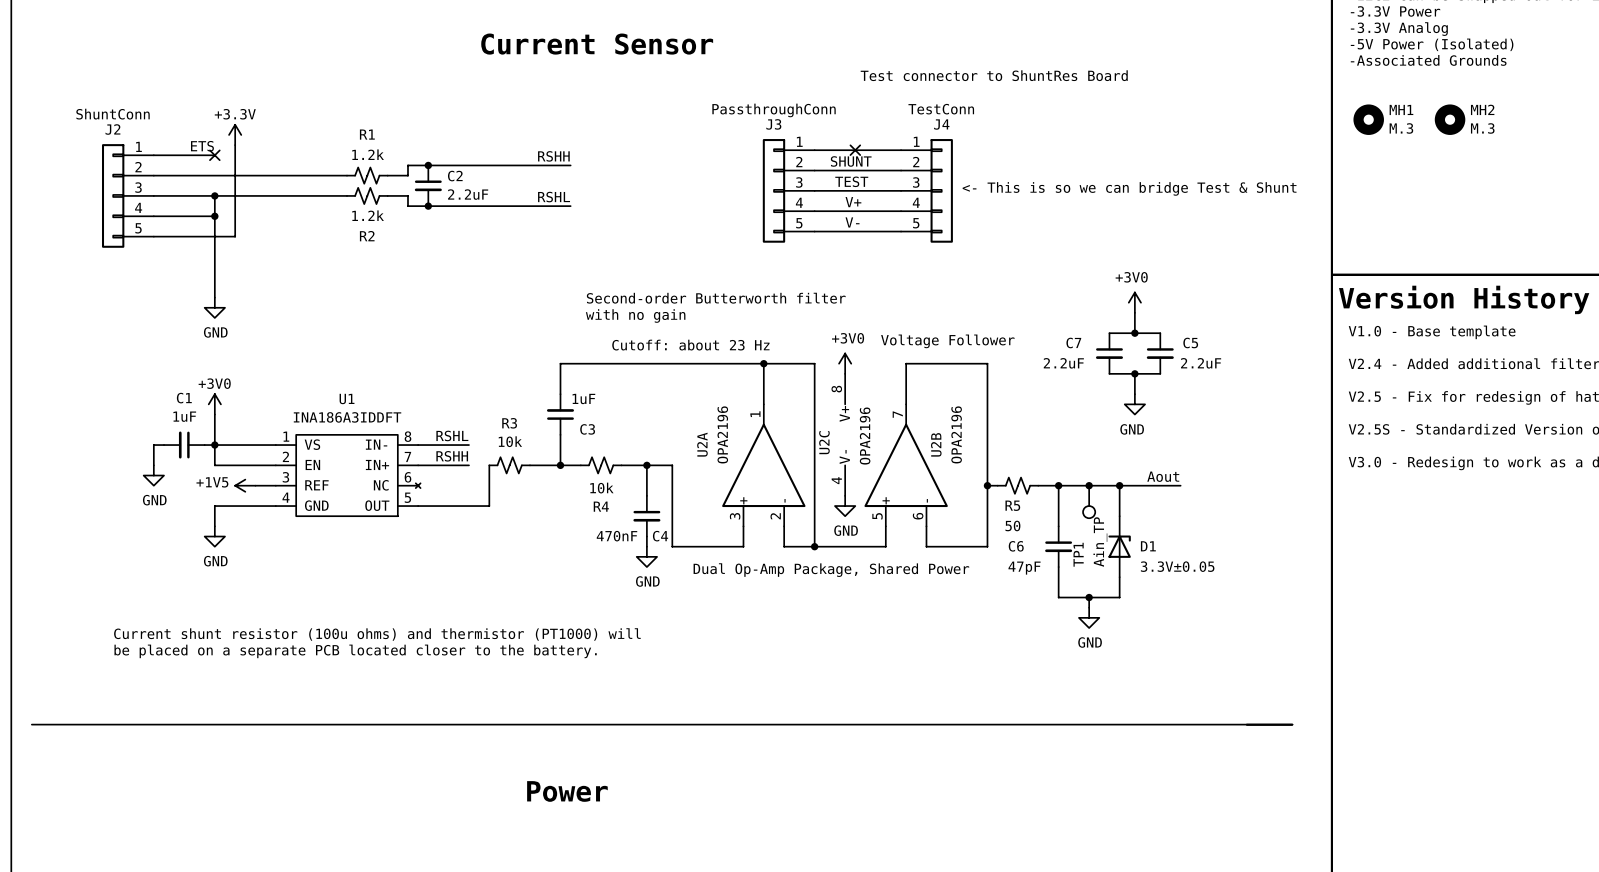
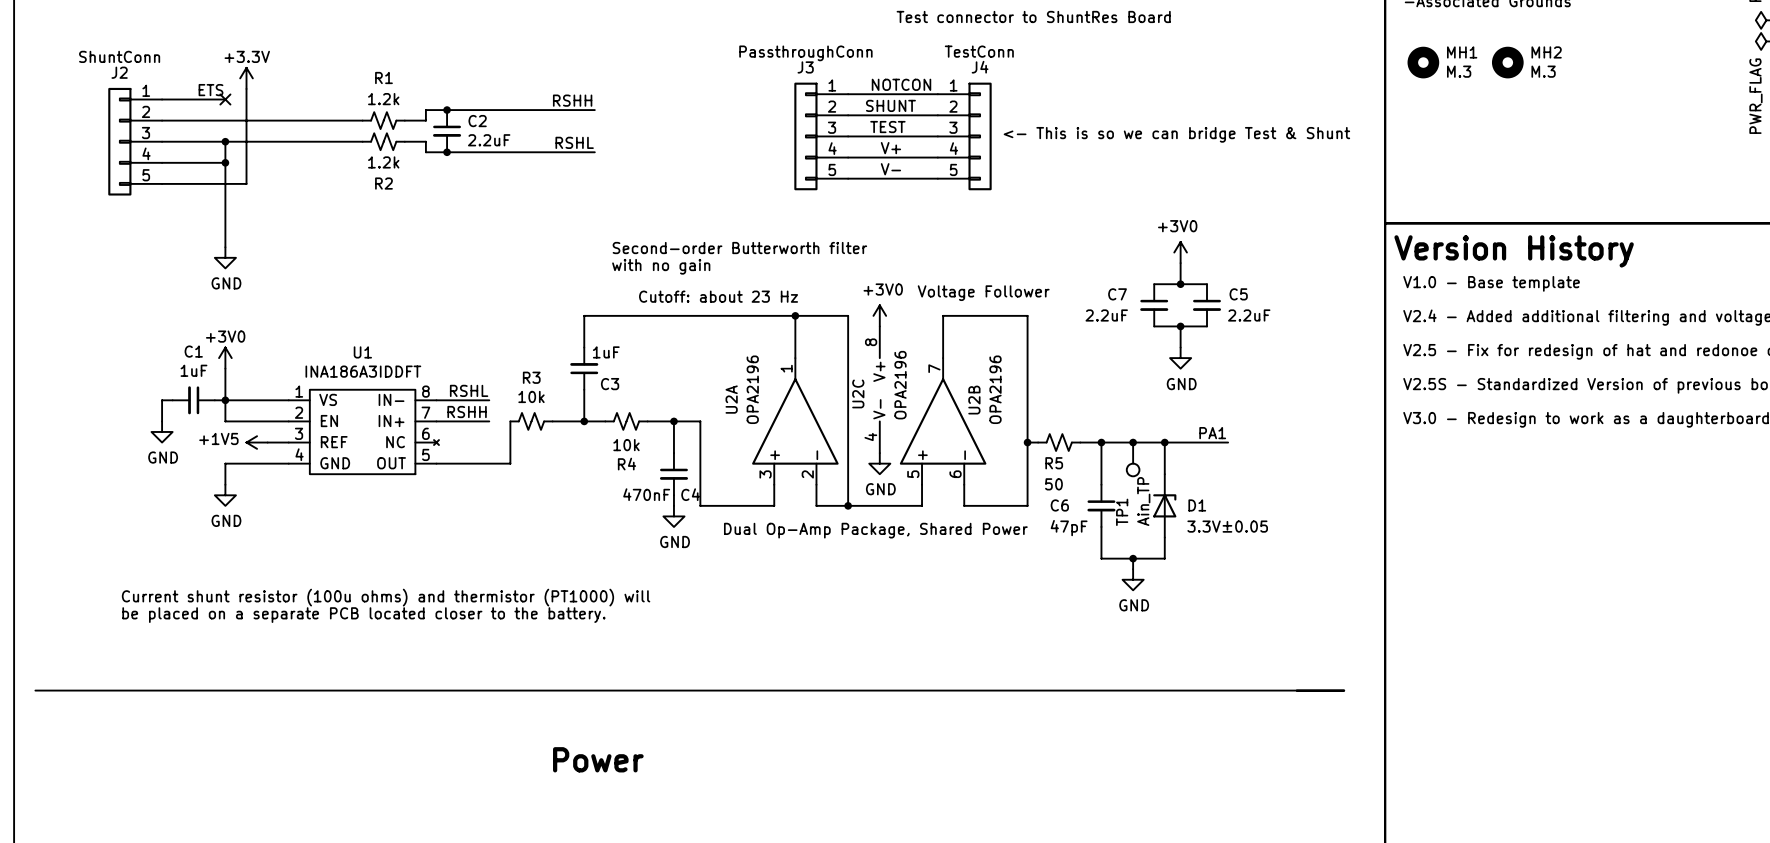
label: none -> NOTCON (901, 84)
no-connect mark: (855, 150) -> none
label: Aout (1163, 476) -> PA1 (1212, 433)

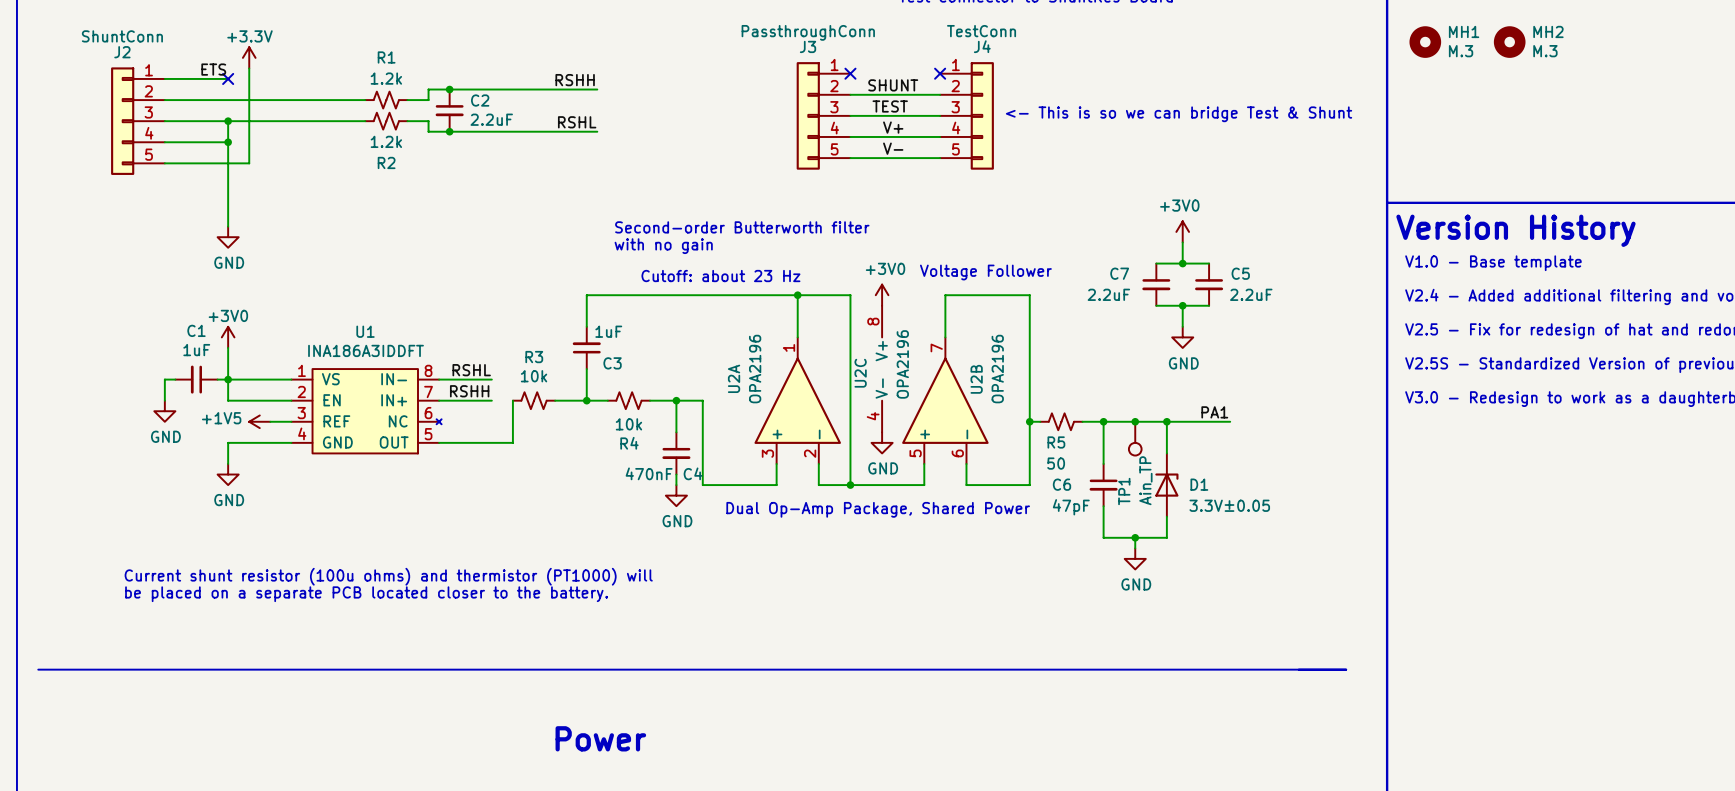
label: NOTCON (901, 84) -> none
wire: (848, 94) (937, 94) -> none
no-connect mark: none -> (850, 73)
no-connect mark: none -> (940, 73)

